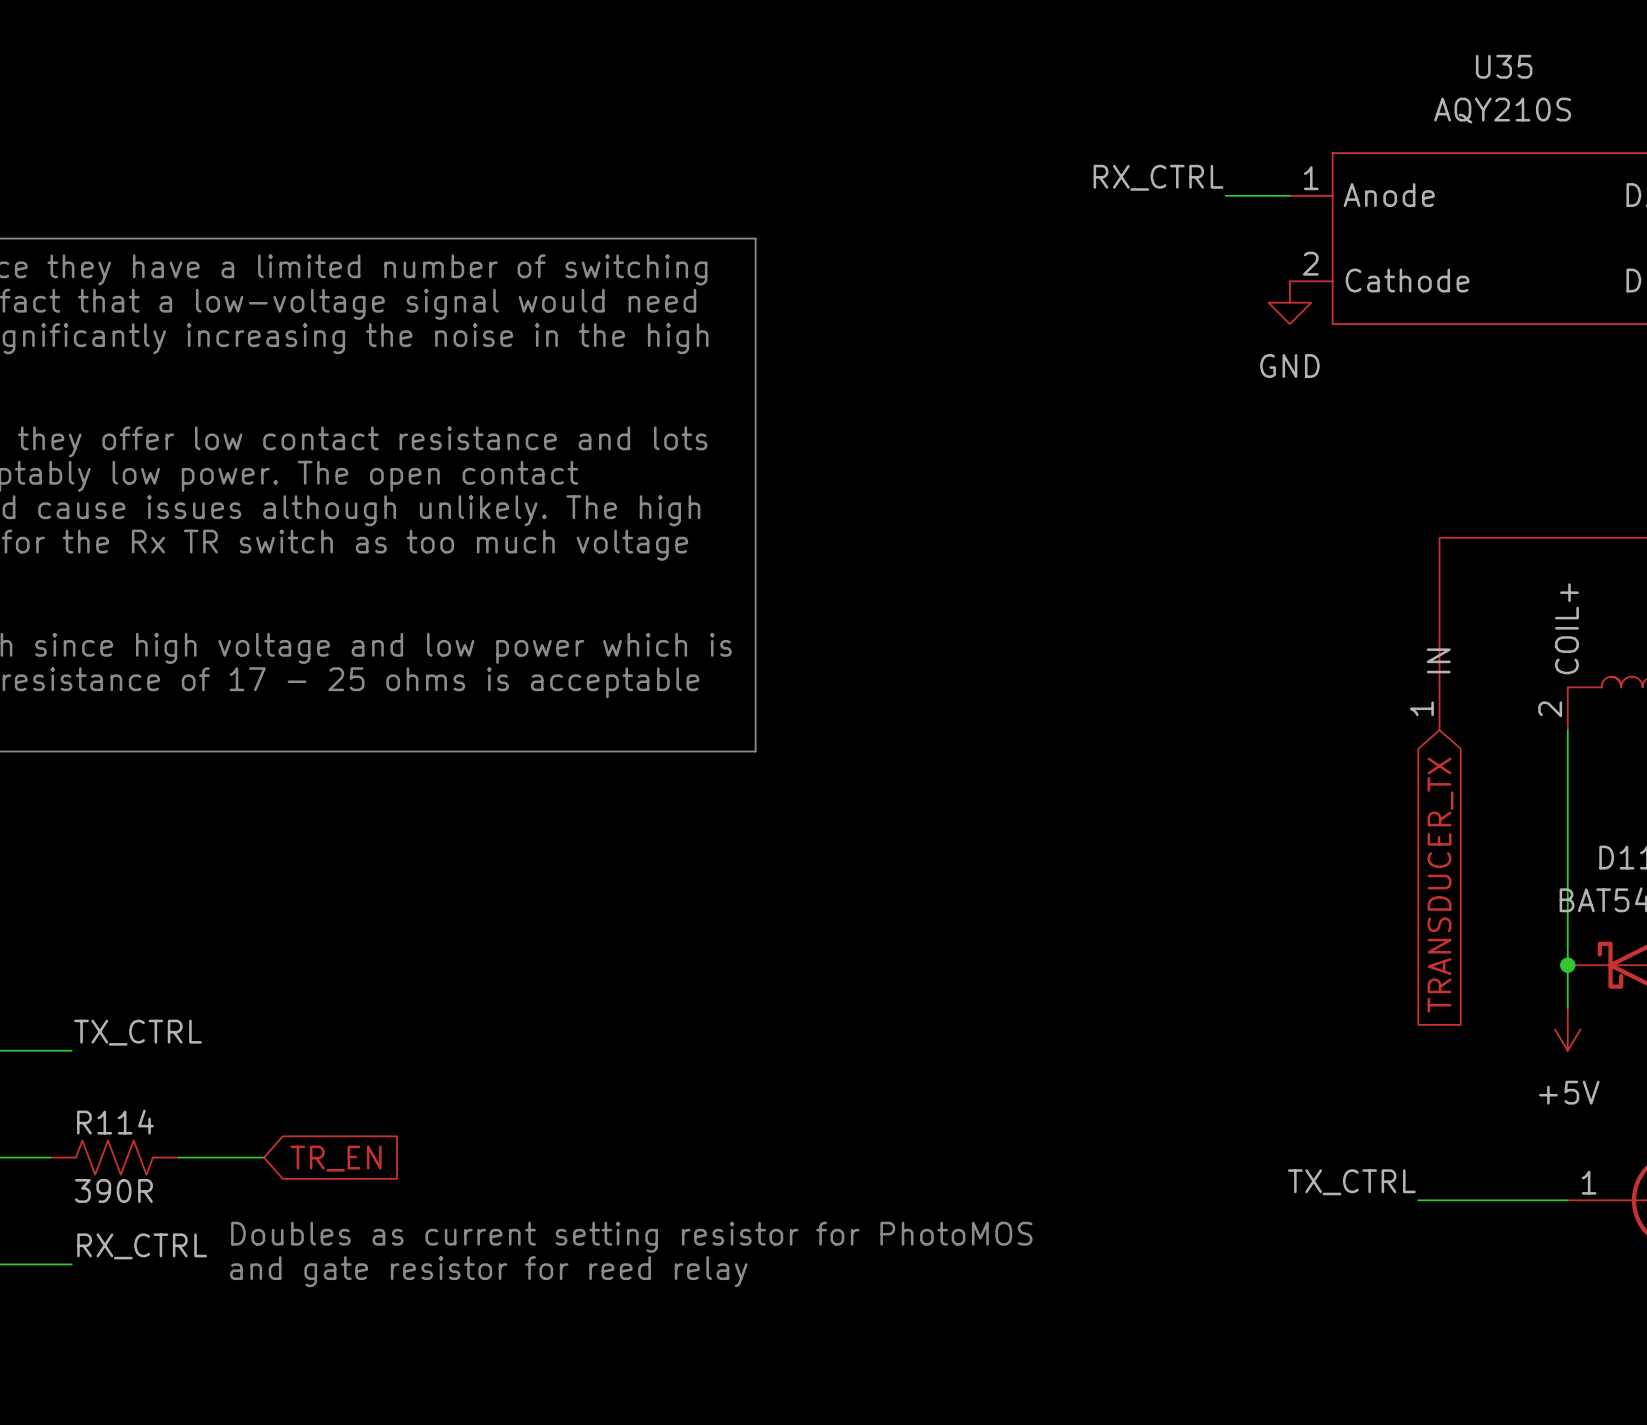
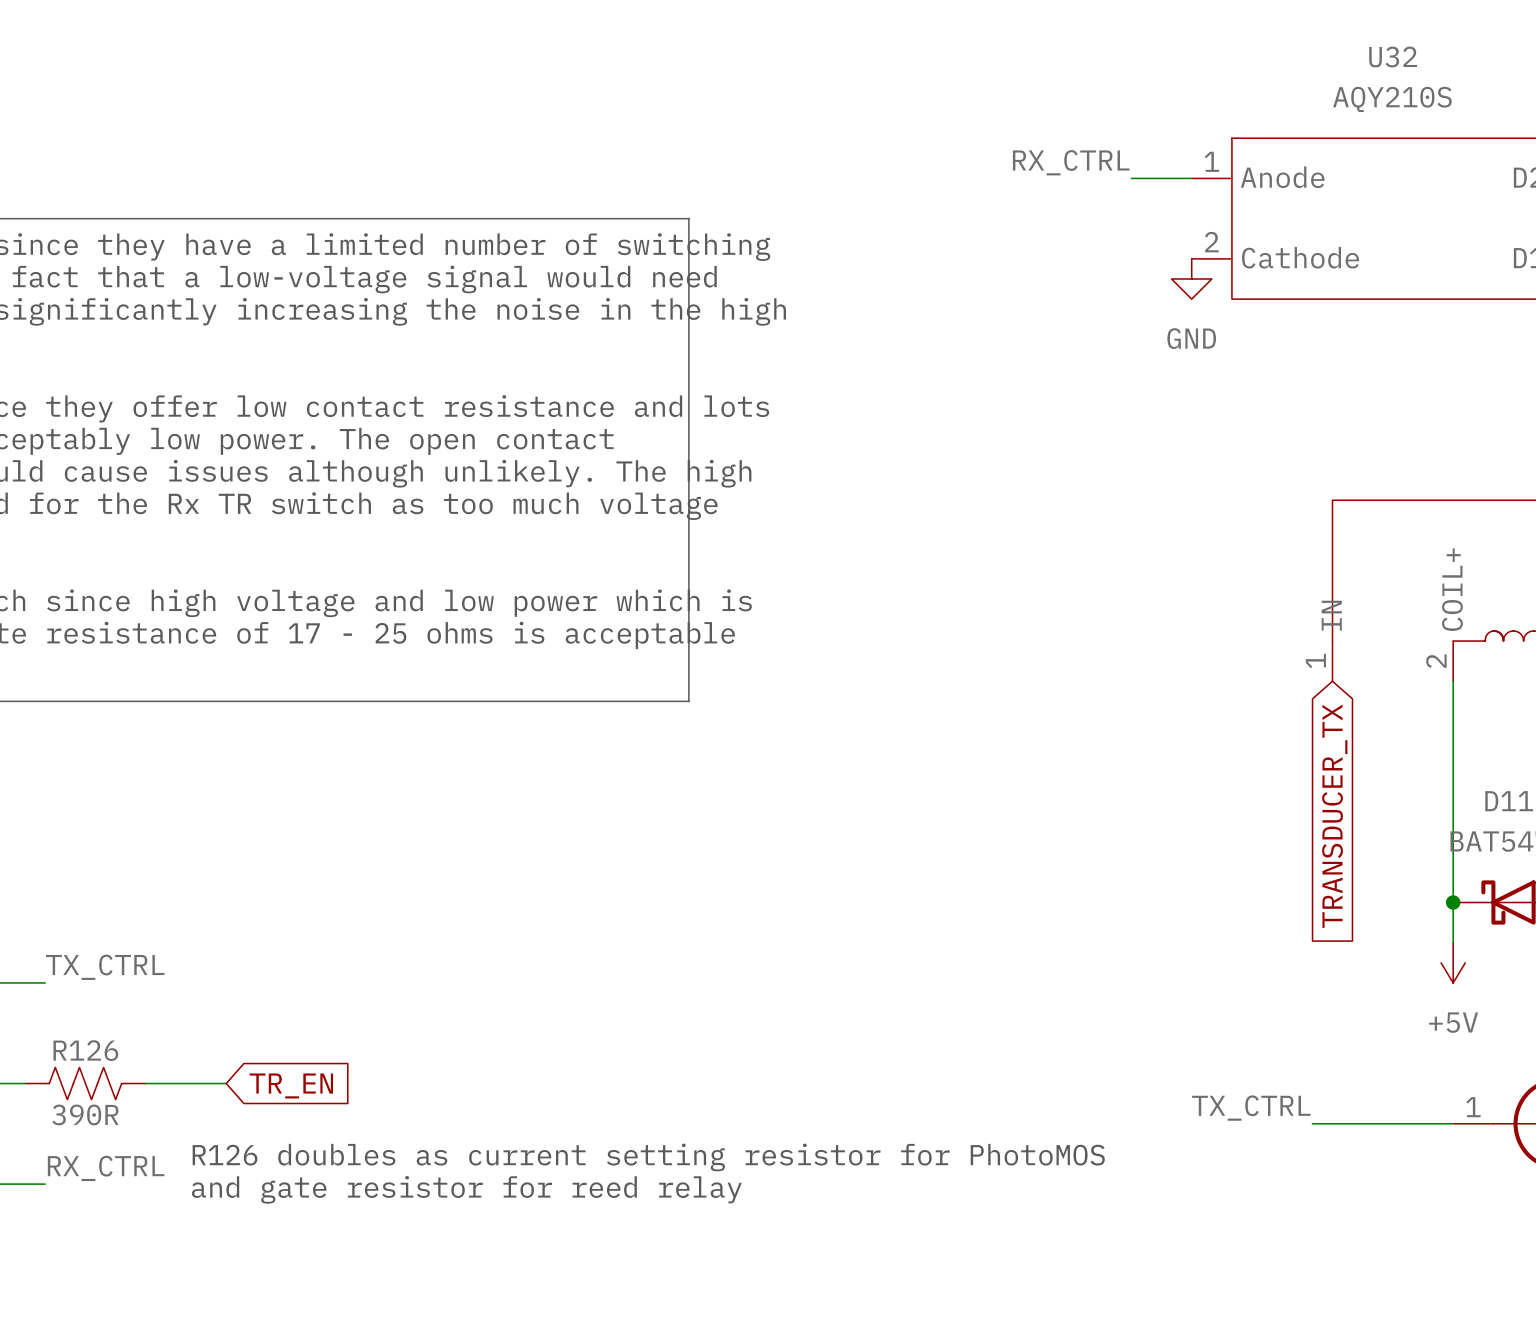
U35 name: U35 (1504, 66) -> U32 (1393, 57)
R114 name: R114 (115, 1122) -> R126 (85, 1050)
text: Doubles as current setting resistor for PhotoMOS (631, 1237) -> R126 doubles as current setting resistor for PhotoMOS (648, 1157)

